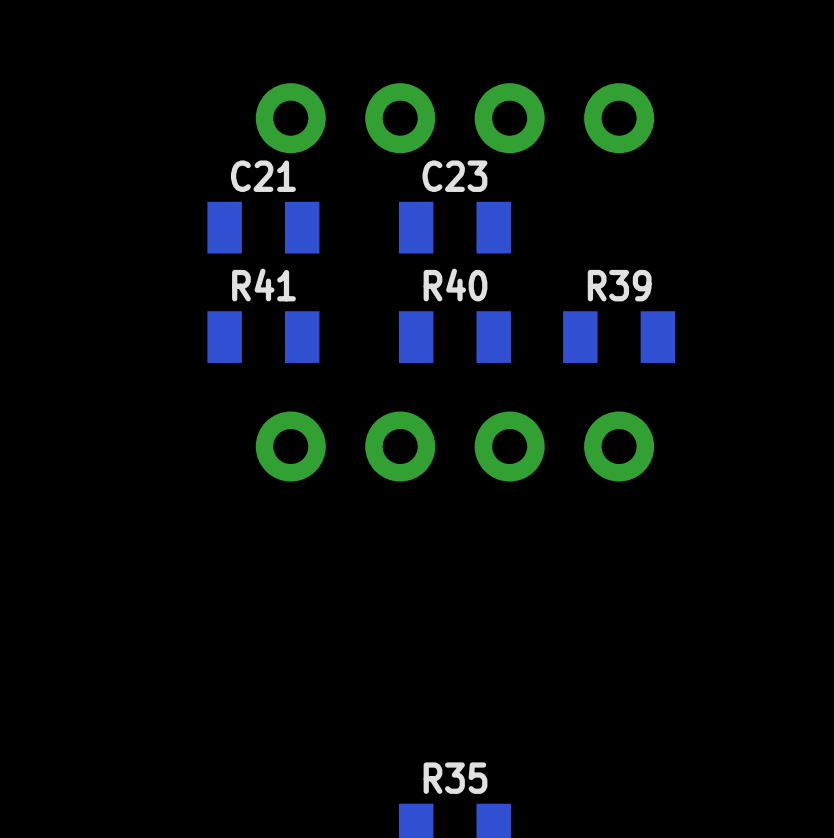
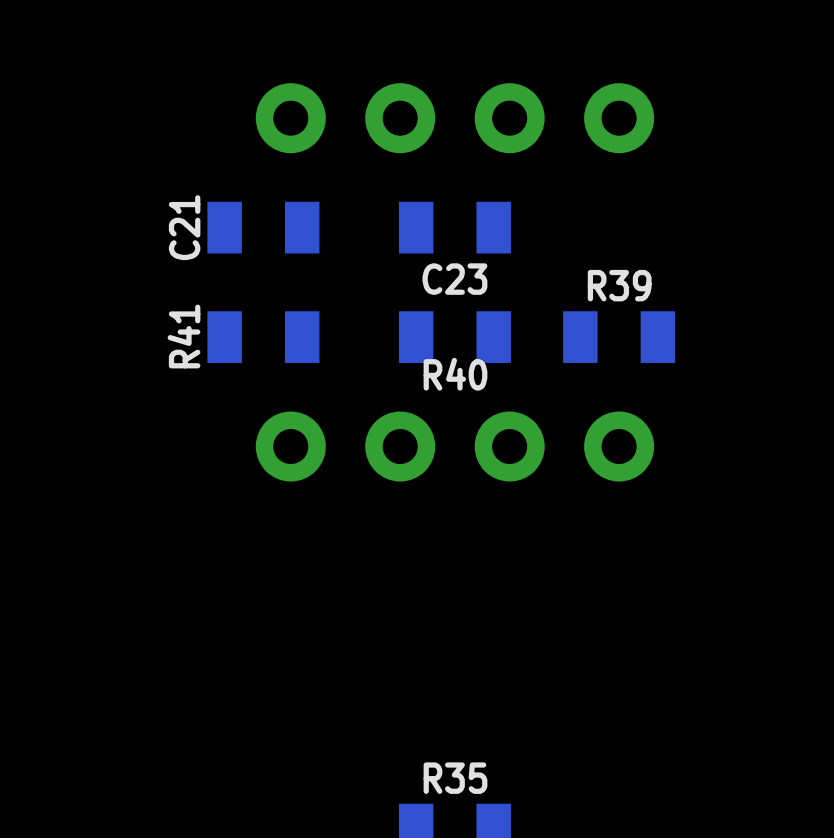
C21 name rotation: 0° (263, 176) -> 90° counterclockwise (184, 227)
C21 name position: C21 (263, 176) -> C21 (184, 227)
C23 name position: C23 (454, 176) -> C23 (454, 279)
R41 name rotation: 0° (263, 285) -> 90° counterclockwise (183, 336)
R41 name position: R41 (263, 285) -> R41 (183, 336)
R40 name position: R40 (455, 285) -> R40 (455, 374)

